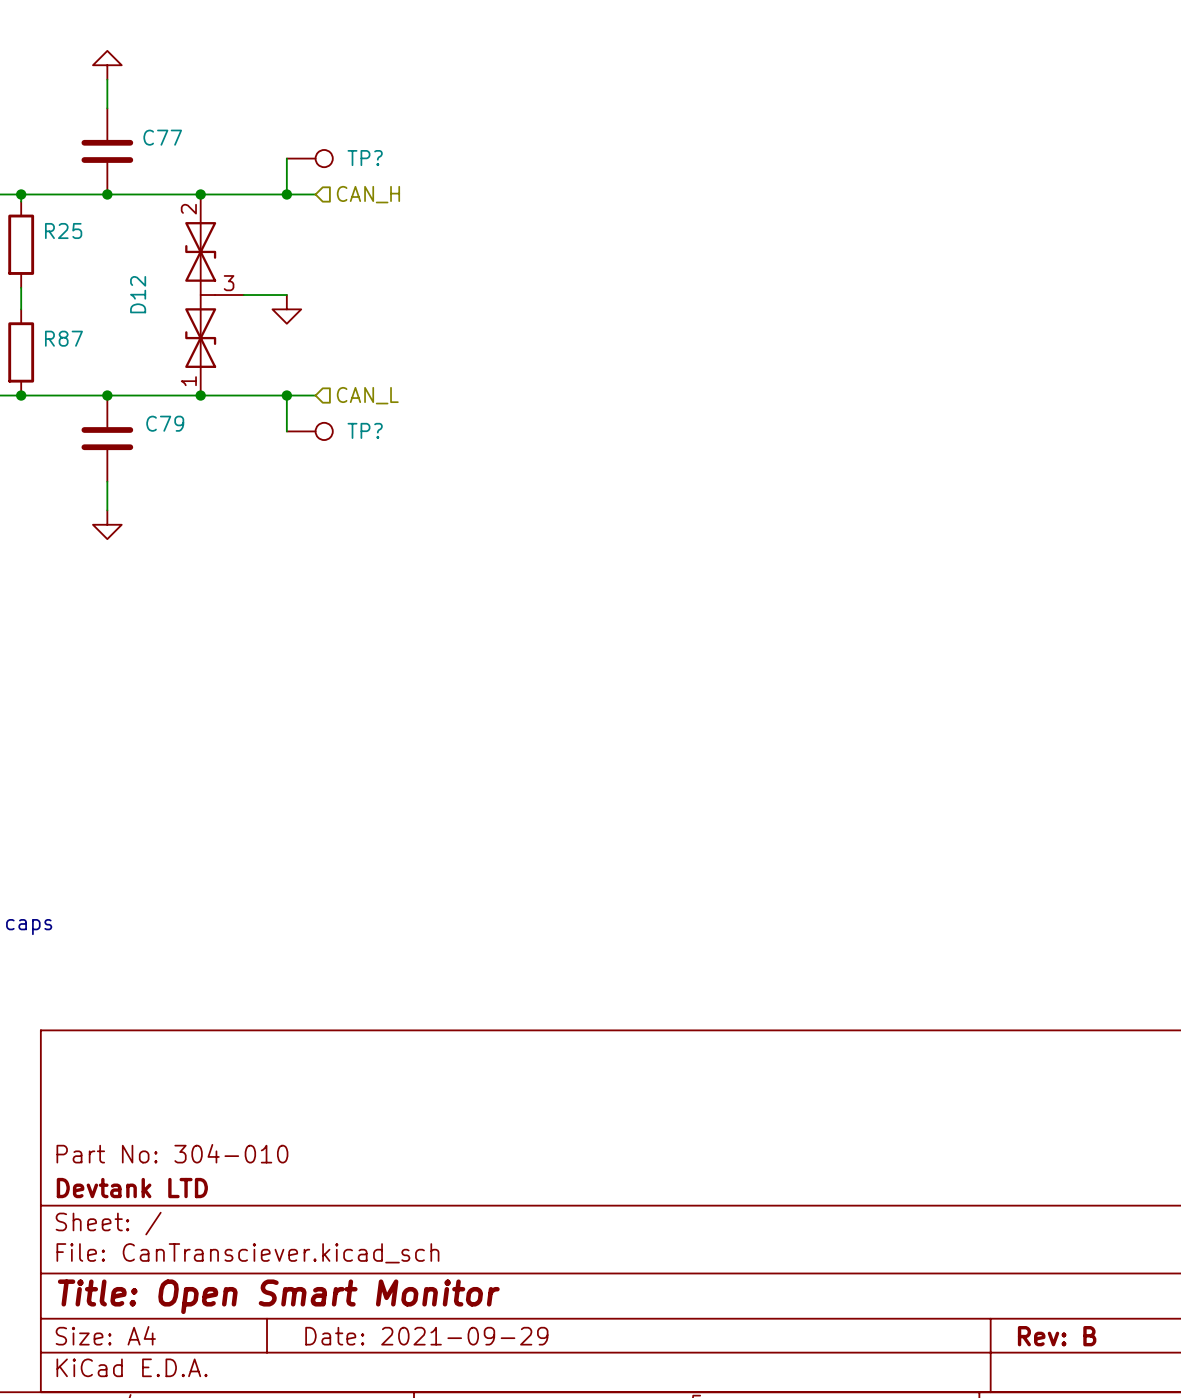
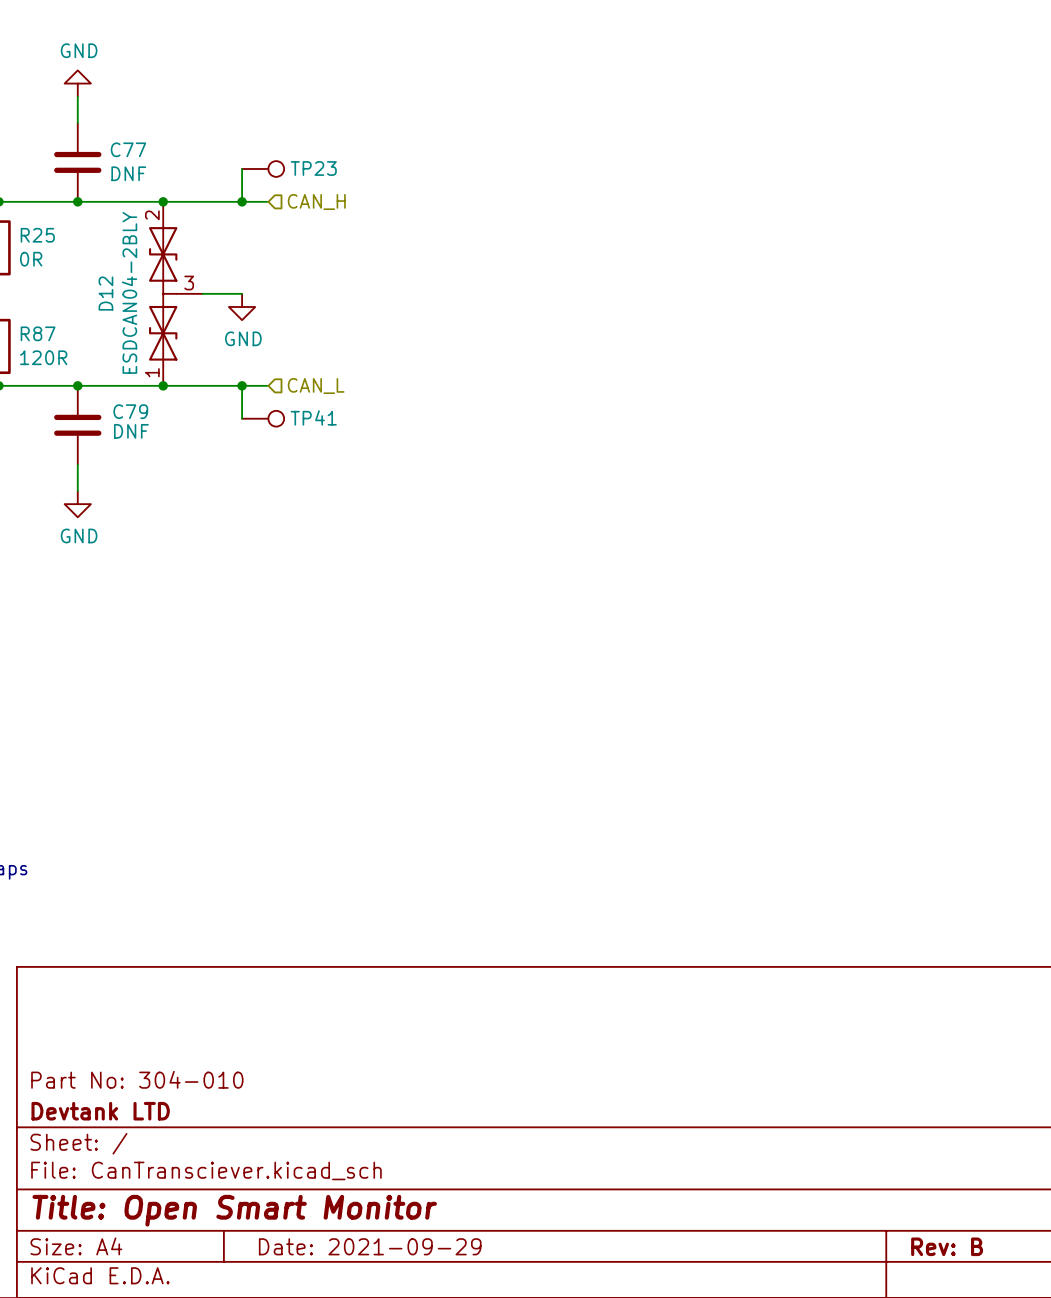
power symbol text: none -> GND (79, 50)
TP? name: TP? (365, 158) -> TP23 (313, 168)
C77 value: none -> DNF (128, 173)
R25 value: none -> 0R (31, 259)
D12 value: none -> ESDCAN04-2BLY (129, 292)
power symbol text: none -> GND (243, 338)
R87 value: none -> 120R (43, 357)
TP? name: TP? (365, 430) -> TP41 (313, 417)
C79 value: none -> DNF (131, 431)
power symbol text: none -> GND (79, 535)

